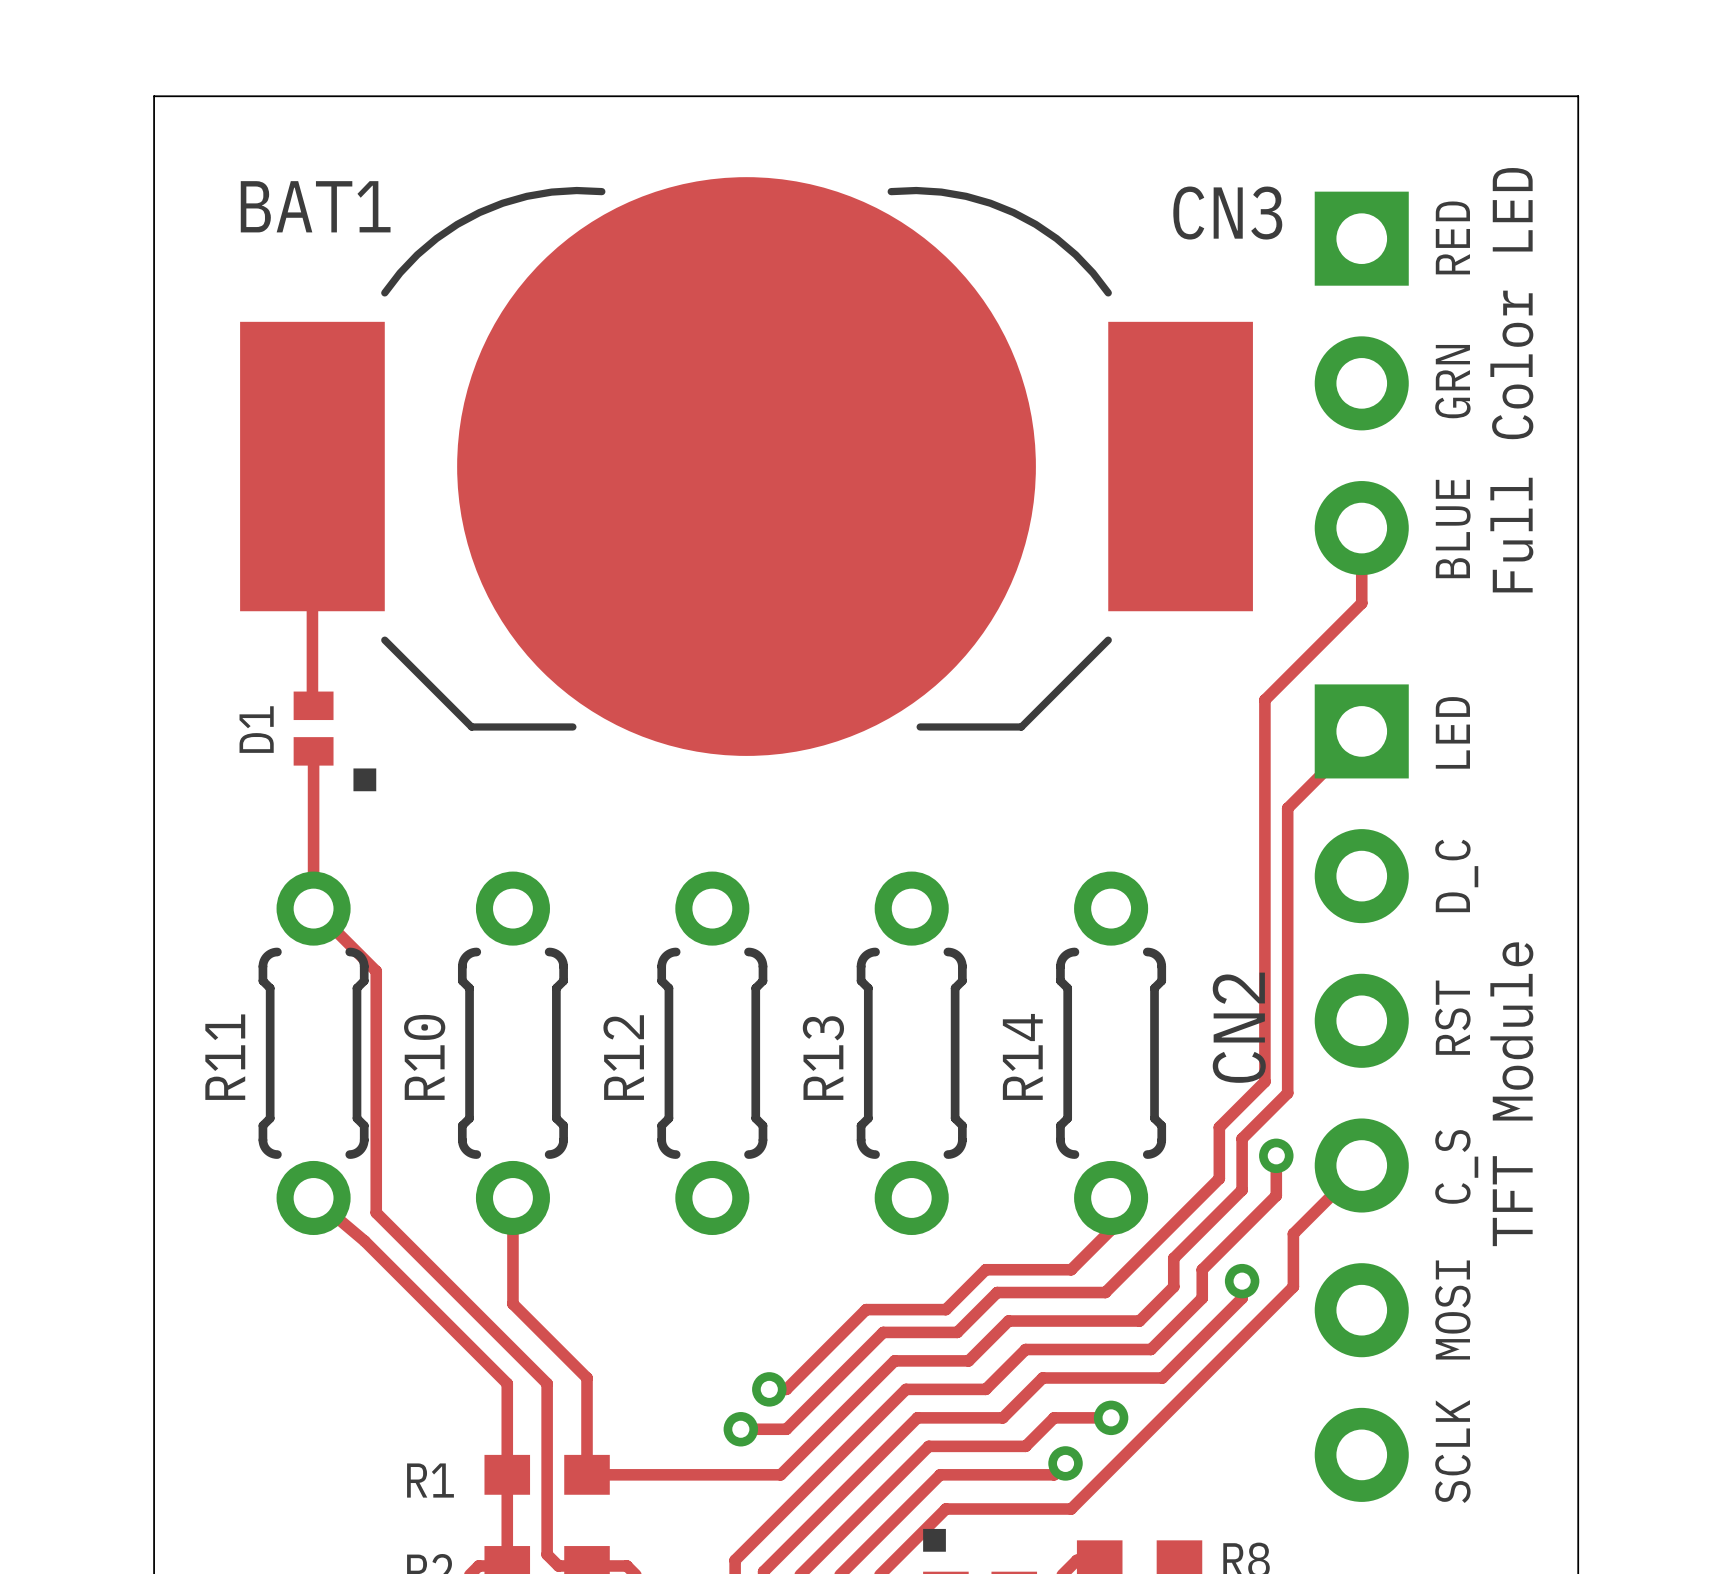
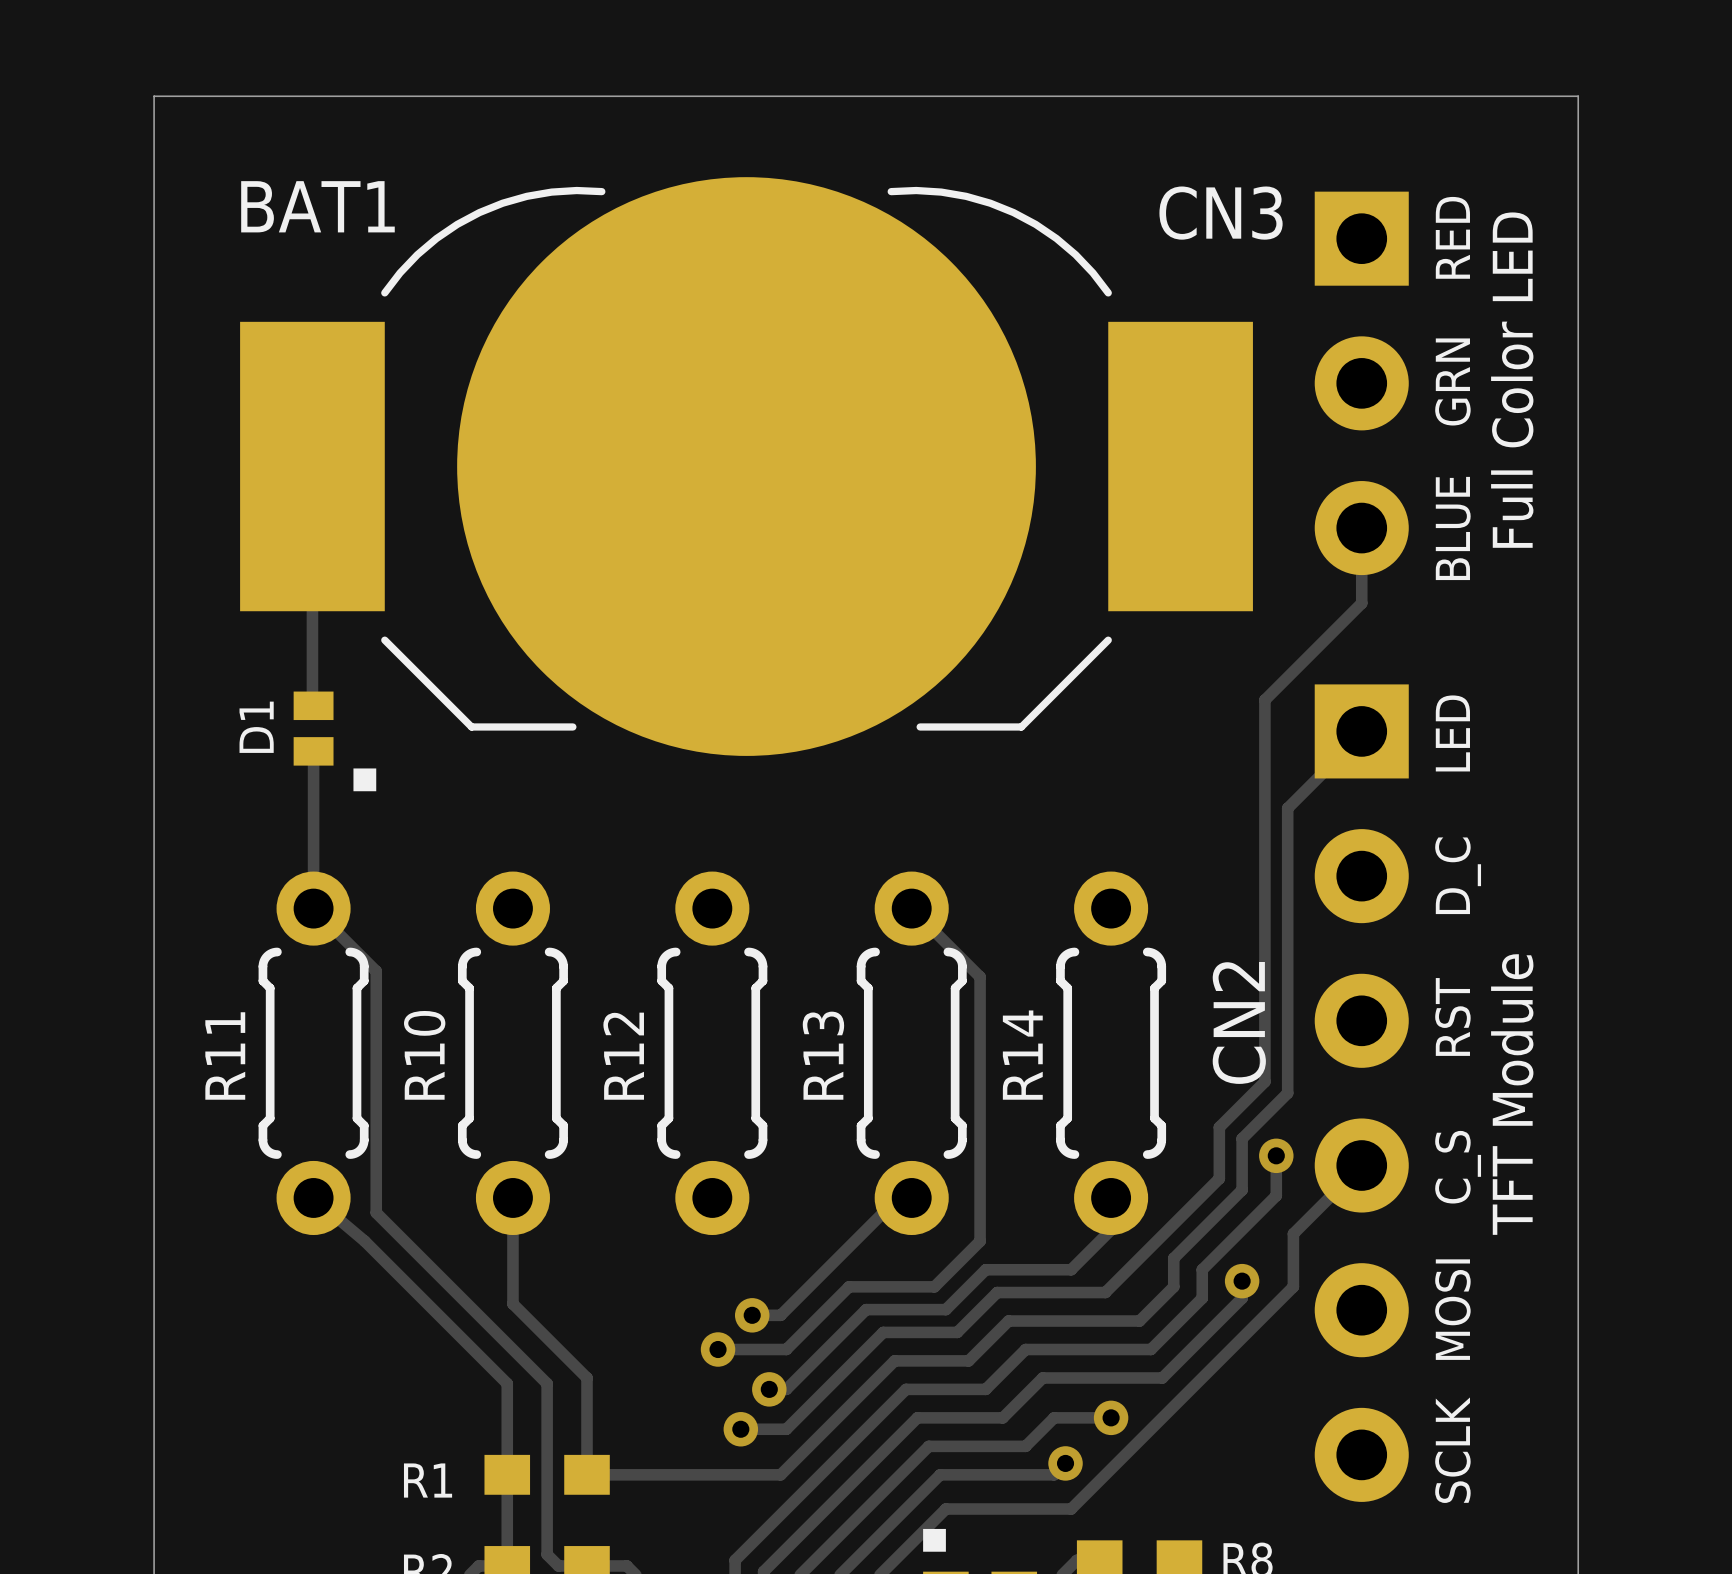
track: none -> (911, 908) (980, 976) (980, 1241) (934, 1286) (849, 1286) (786, 1349) (718, 1349)
track: none -> (911, 1197) (898, 1197) (780, 1315) (752, 1315)
via: none -> (752, 1315)
via: none -> (718, 1349)

